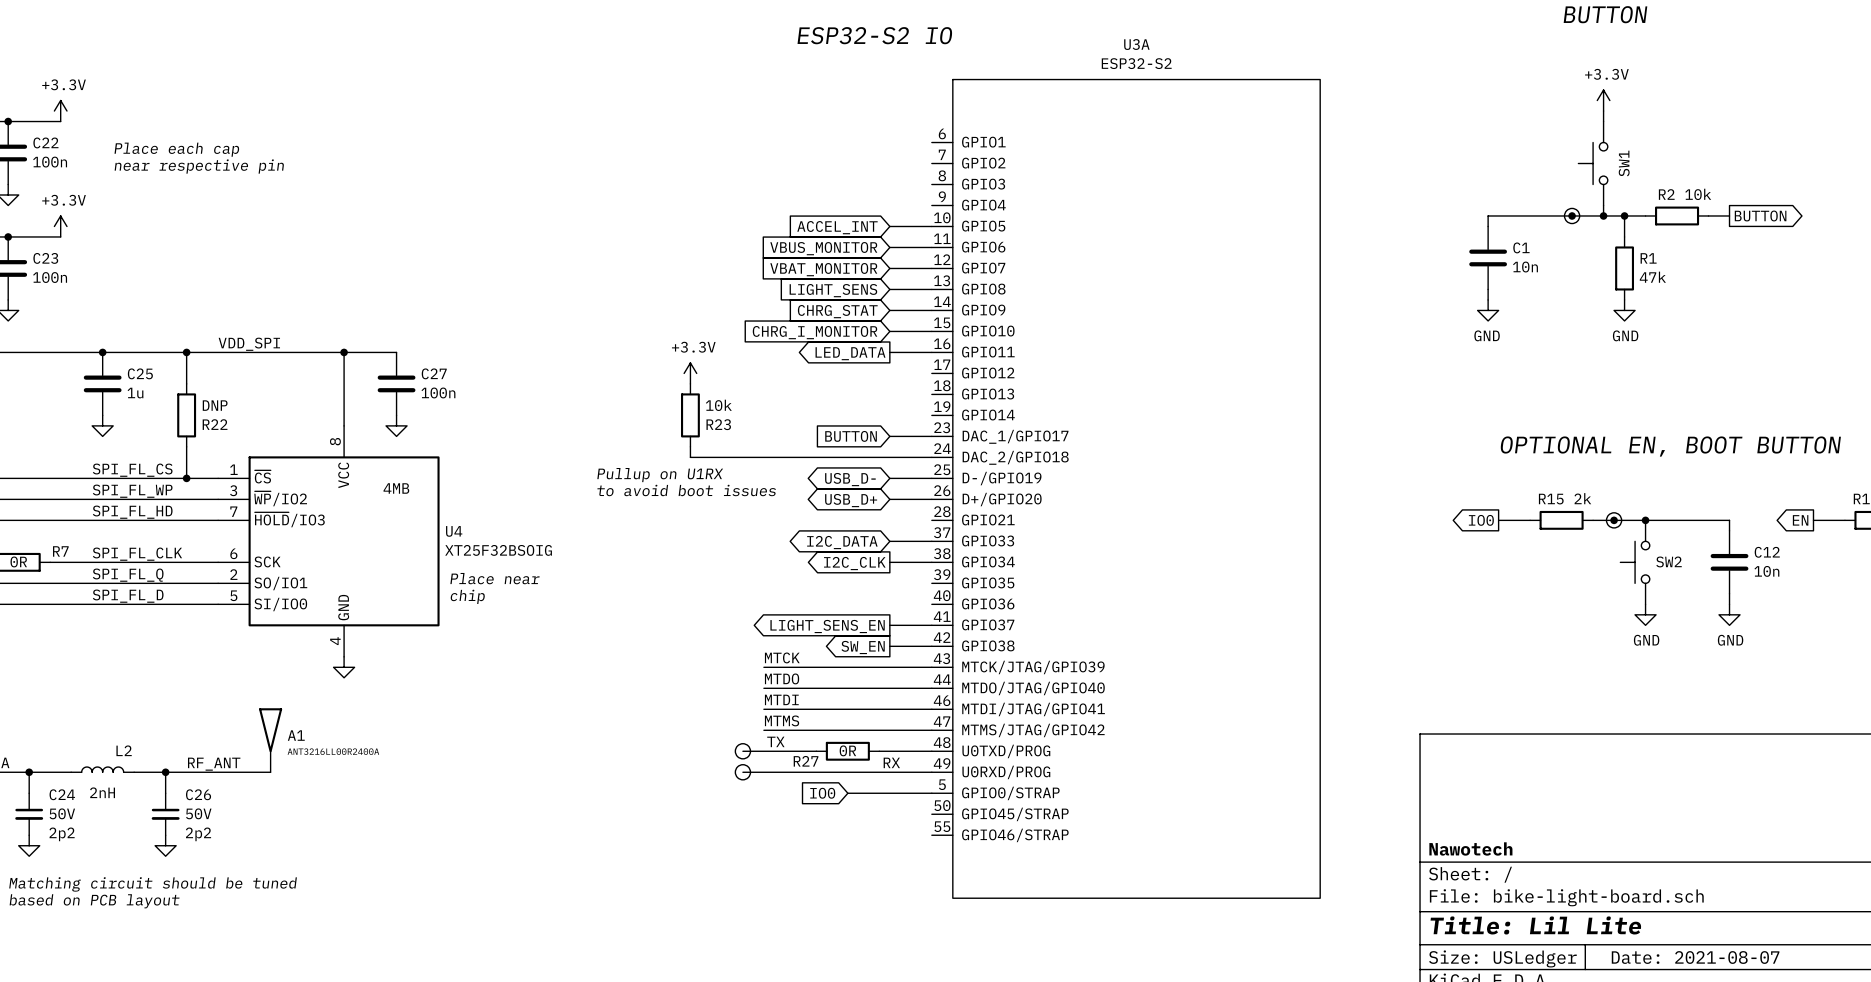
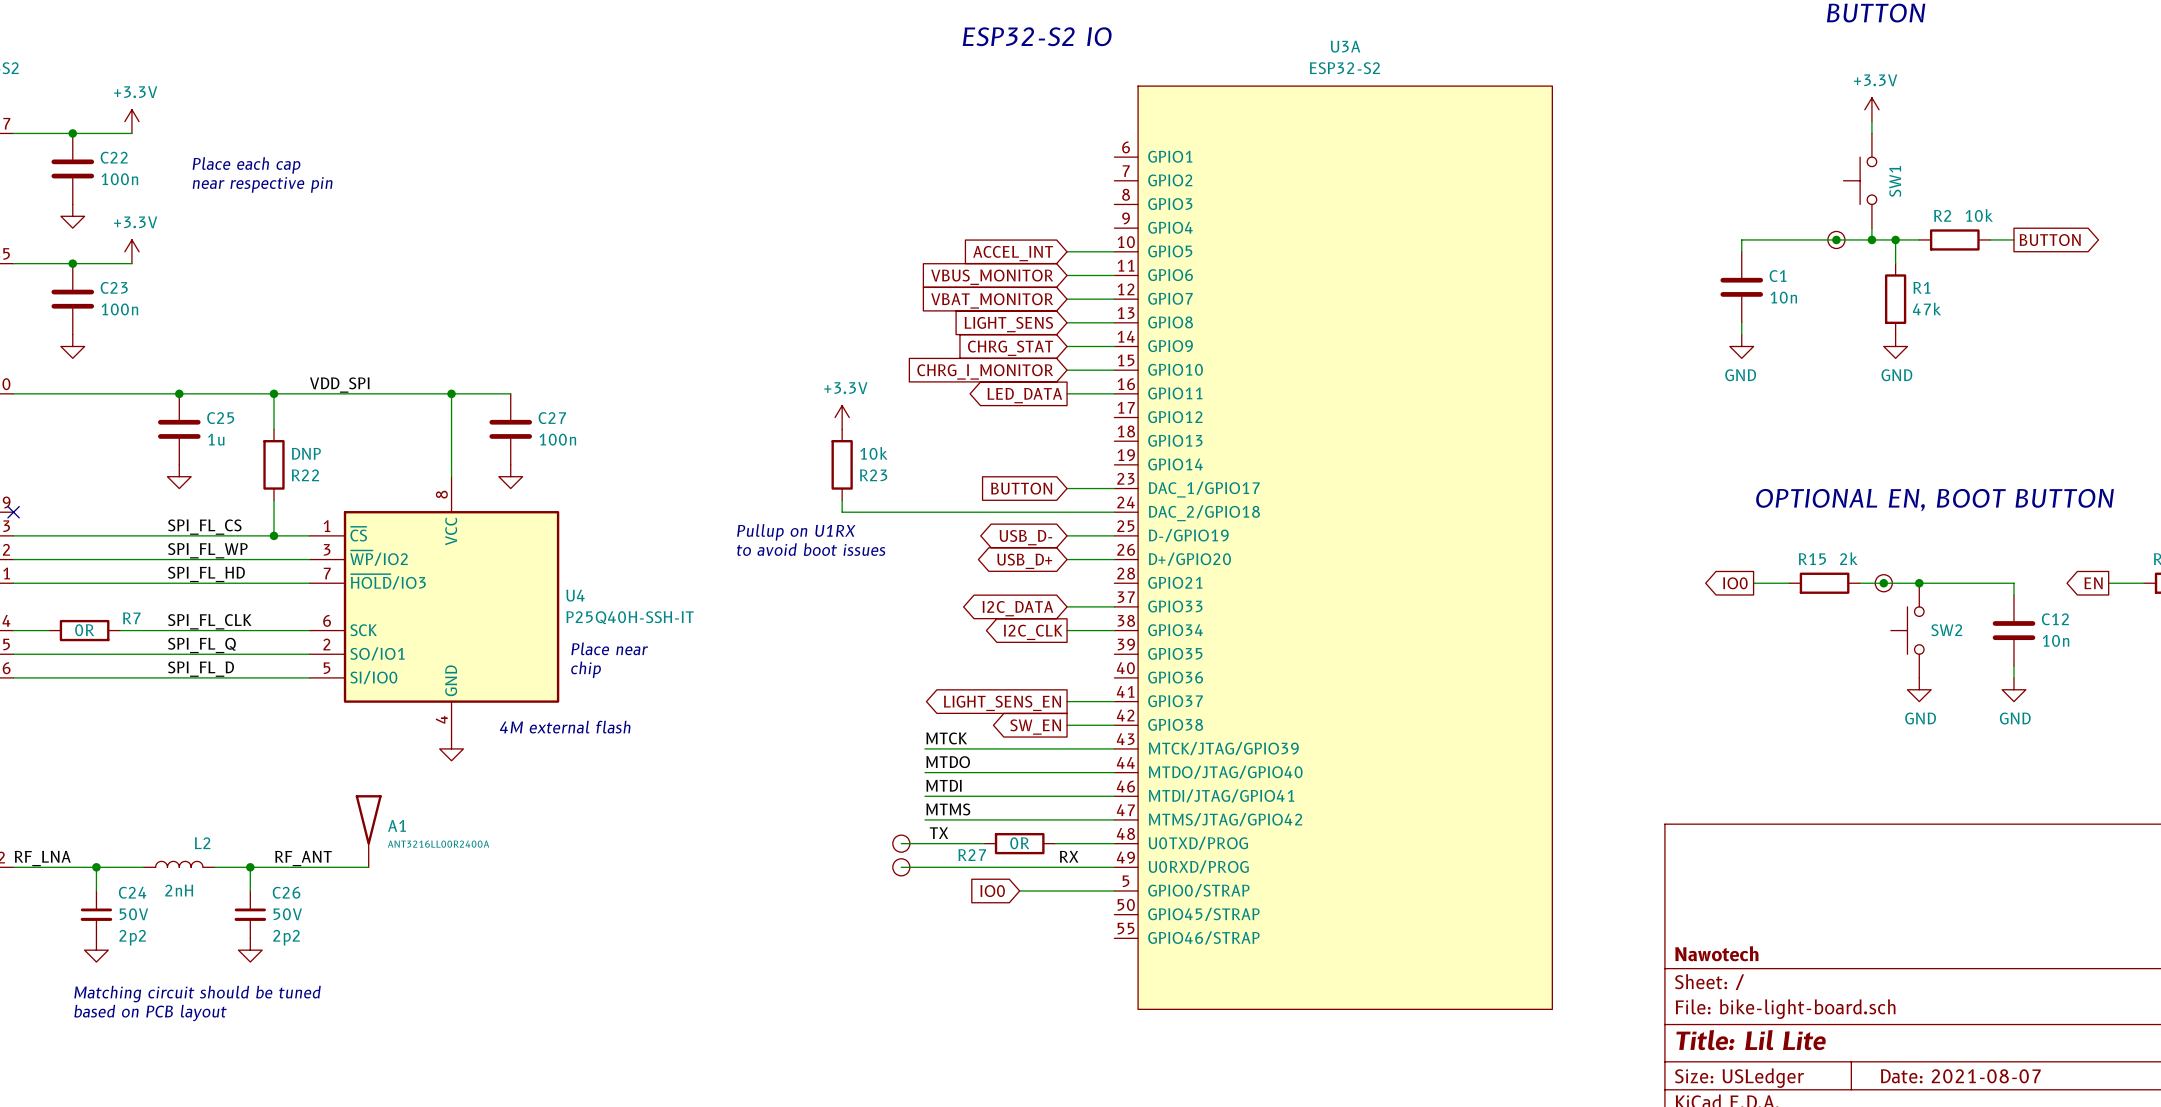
U4 text: 4MB (396, 488) -> none
U4 value: XT25F32BSOIG (498, 550) -> P25Q40H-SSH-IT (630, 617)
text: none -> 4M external flash (565, 727)

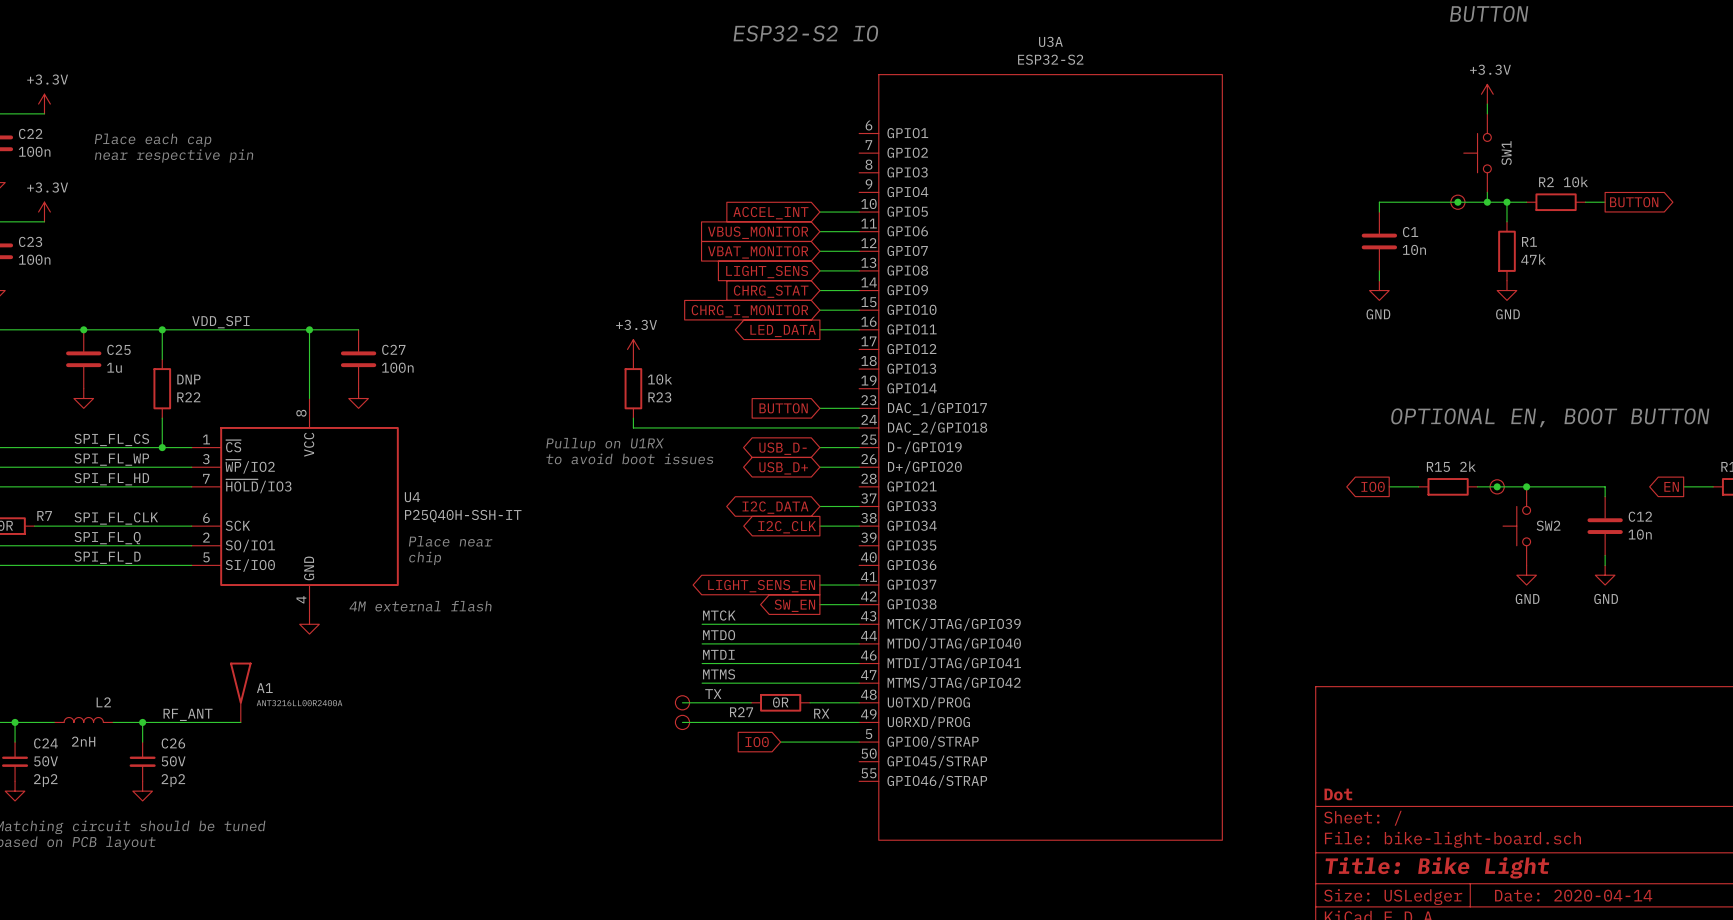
title block: Nawotech (1716, 953) -> Dot (1338, 794)
title block: Title: Lil Lite (1751, 1040) -> Title: Bike Light (1437, 867)
title block: Date: 2021-08-07 (1960, 1076) -> Date: 2020-04-14 (1573, 895)

